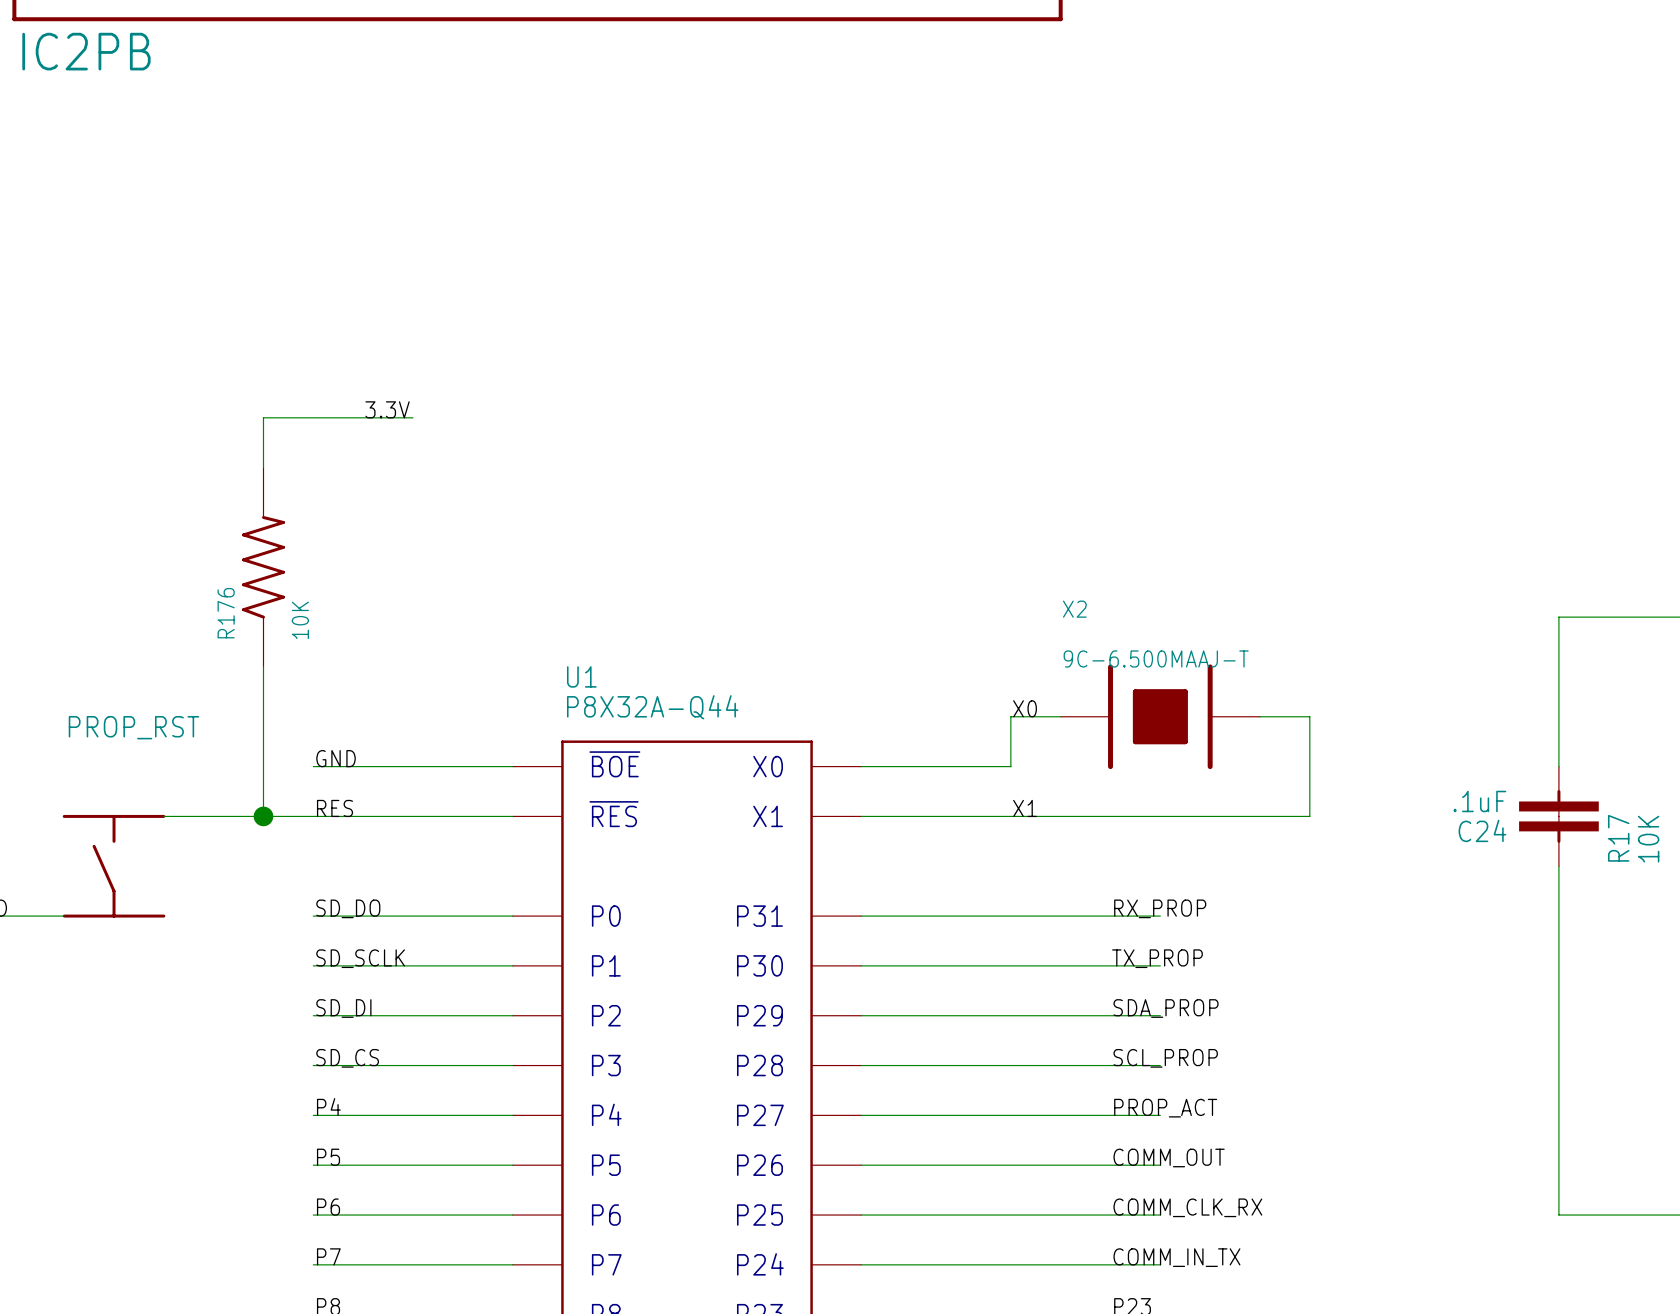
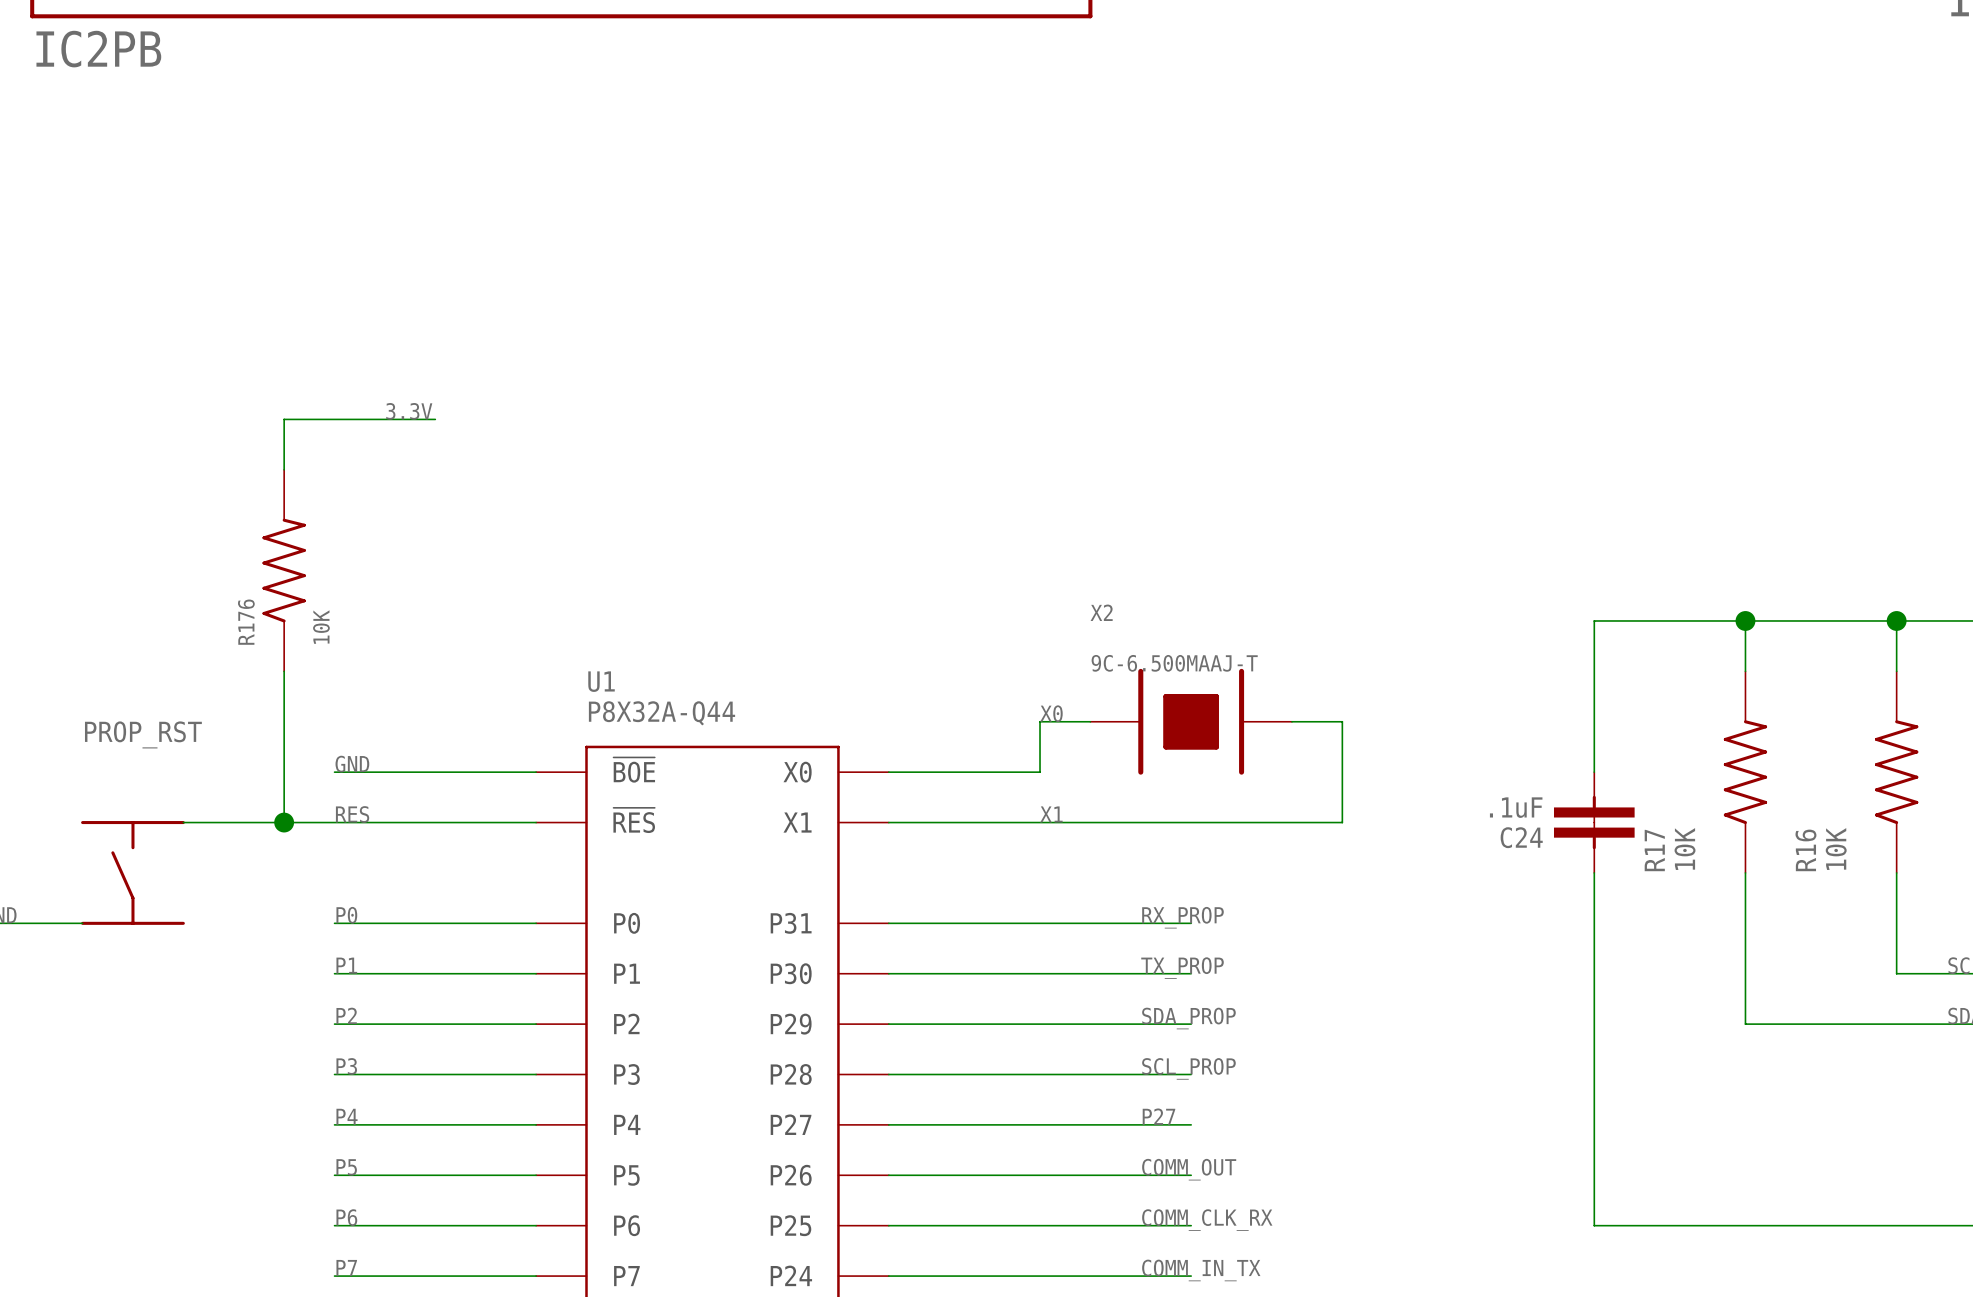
label: SD_DO (348, 908) -> P0 (346, 915)
label: SD_SCLK (360, 958) -> P1 (346, 965)
label: SD_DI (343, 1008) -> P2 (346, 1015)
label: SD_CS (347, 1058) -> P3 (346, 1066)
label: PROP_ACT (1165, 1108) -> P27 (1158, 1116)

